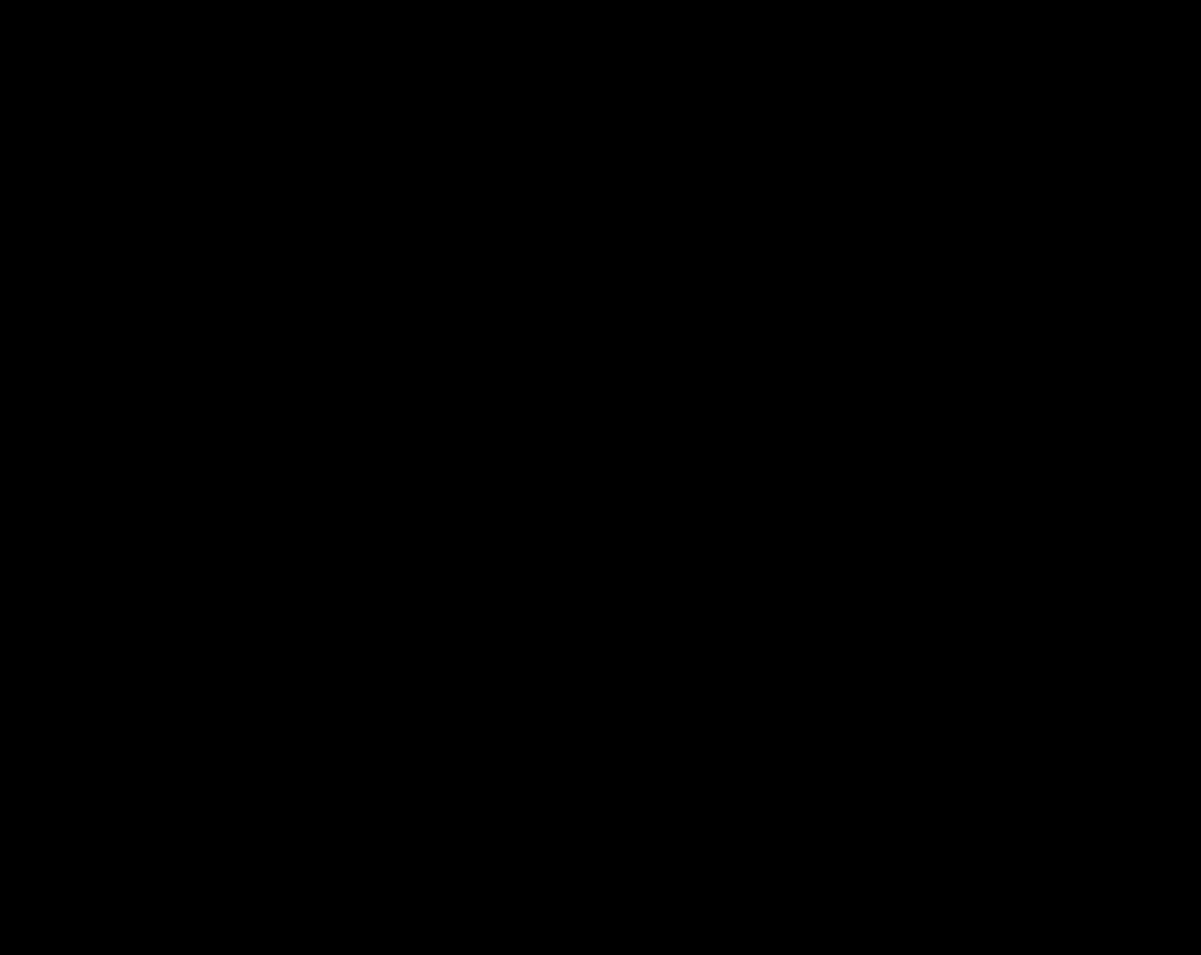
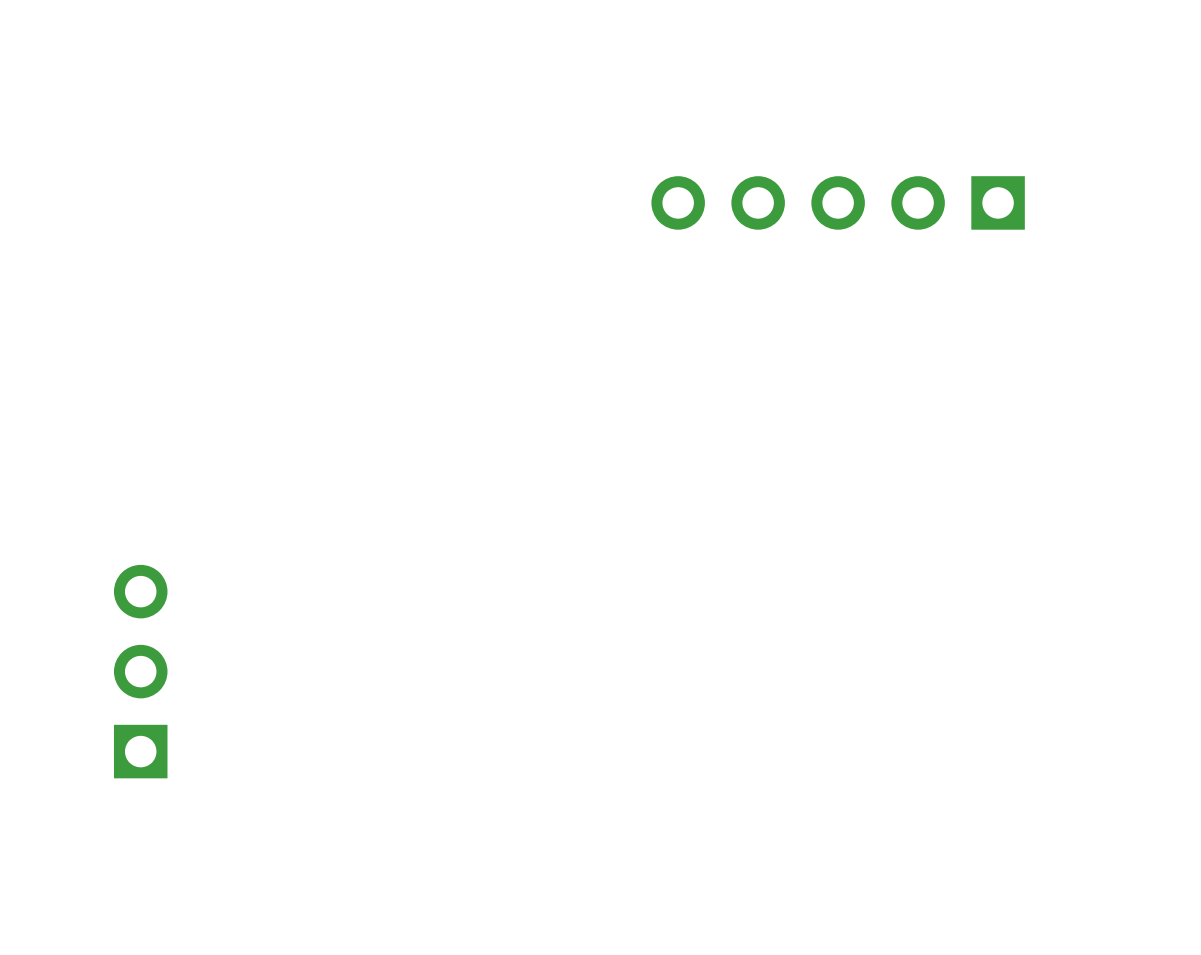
part: none -> (838, 202)
part: none -> (140, 671)

